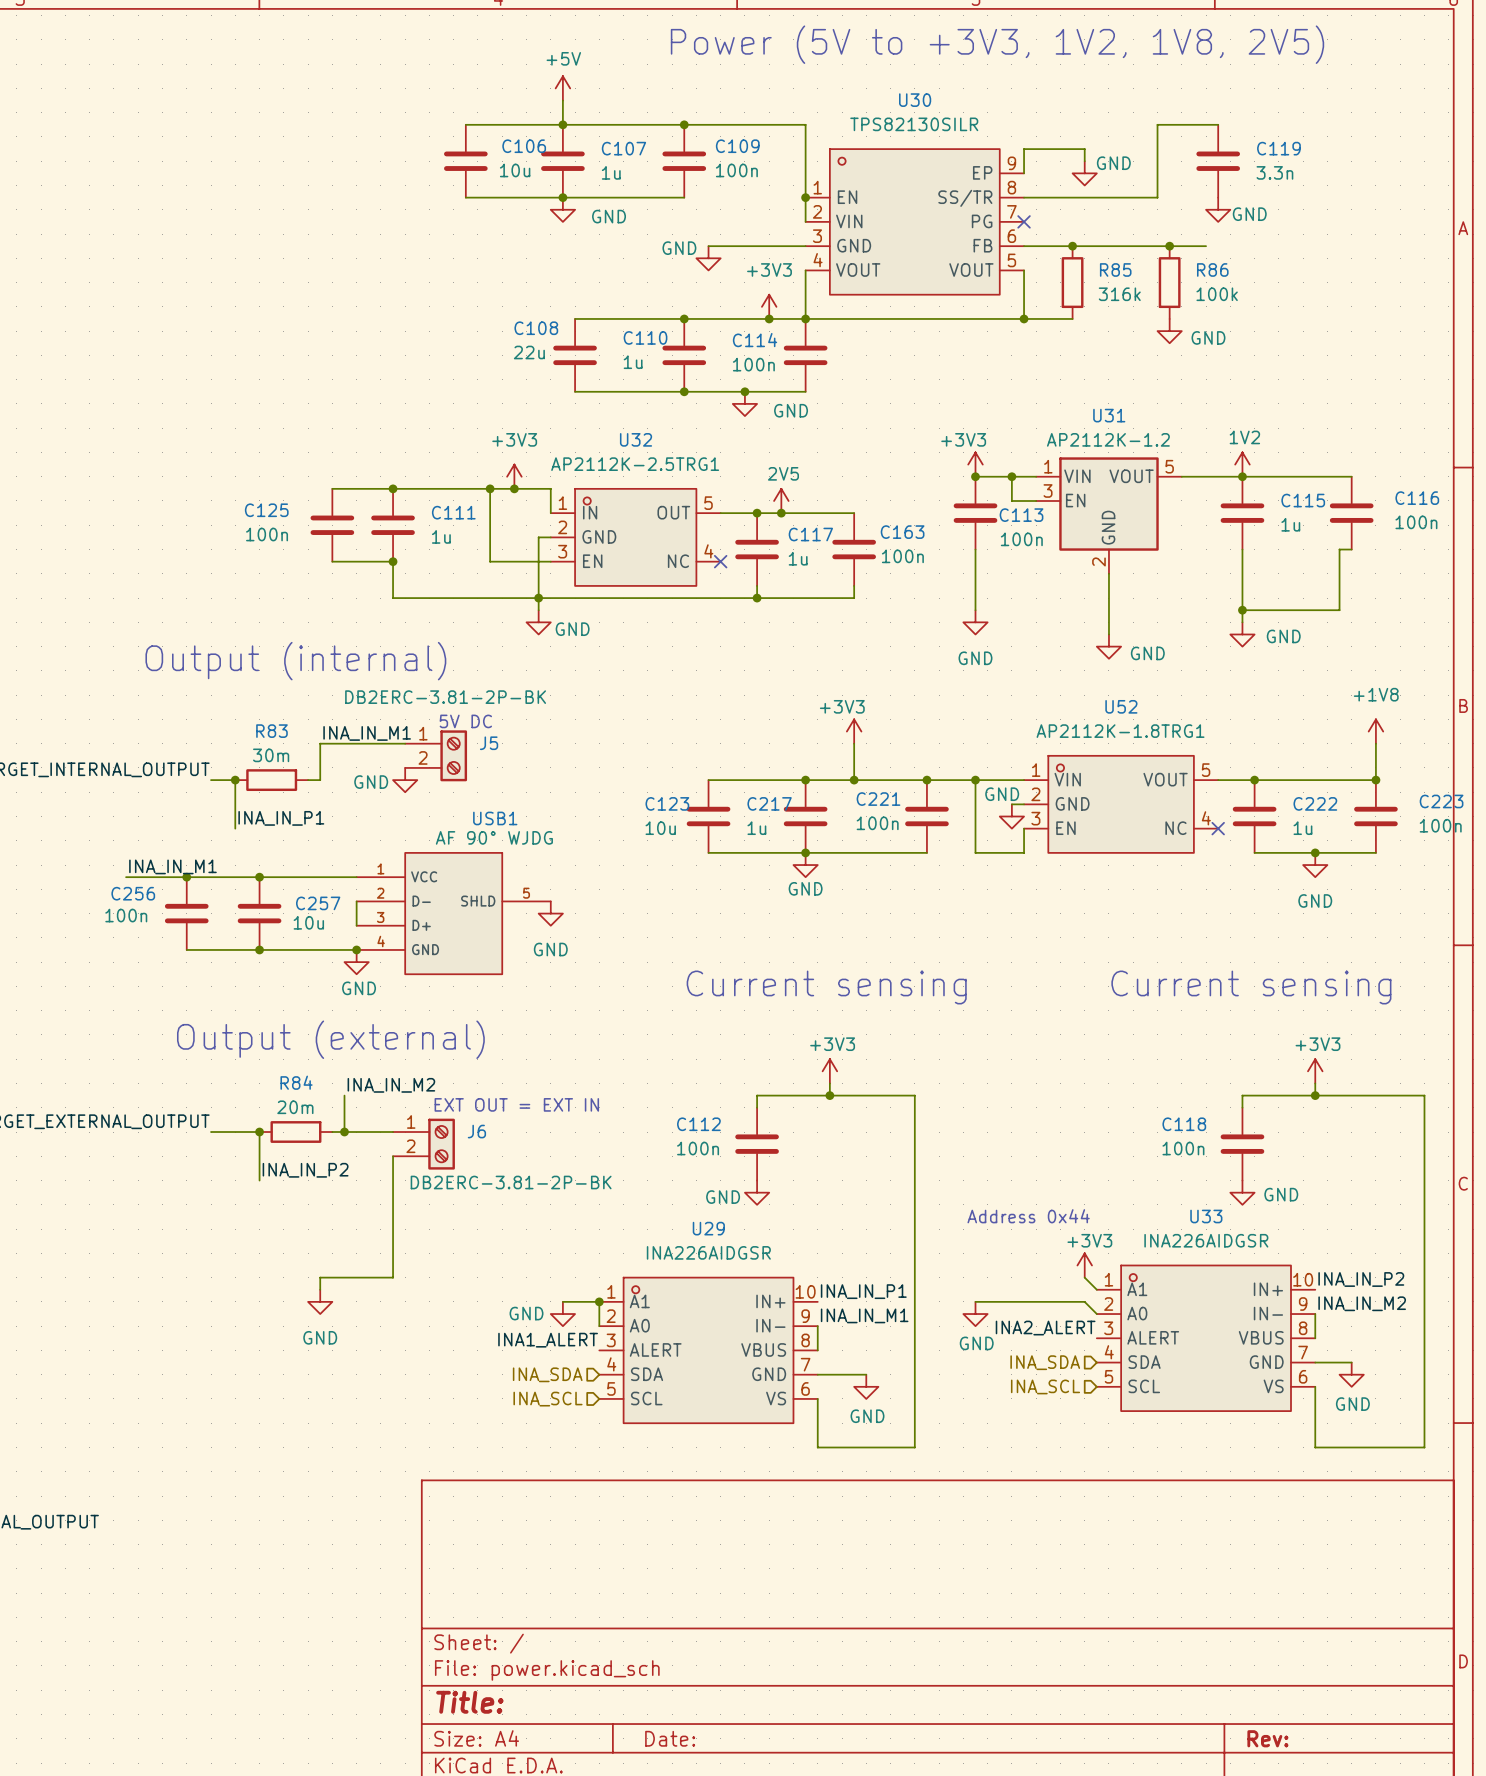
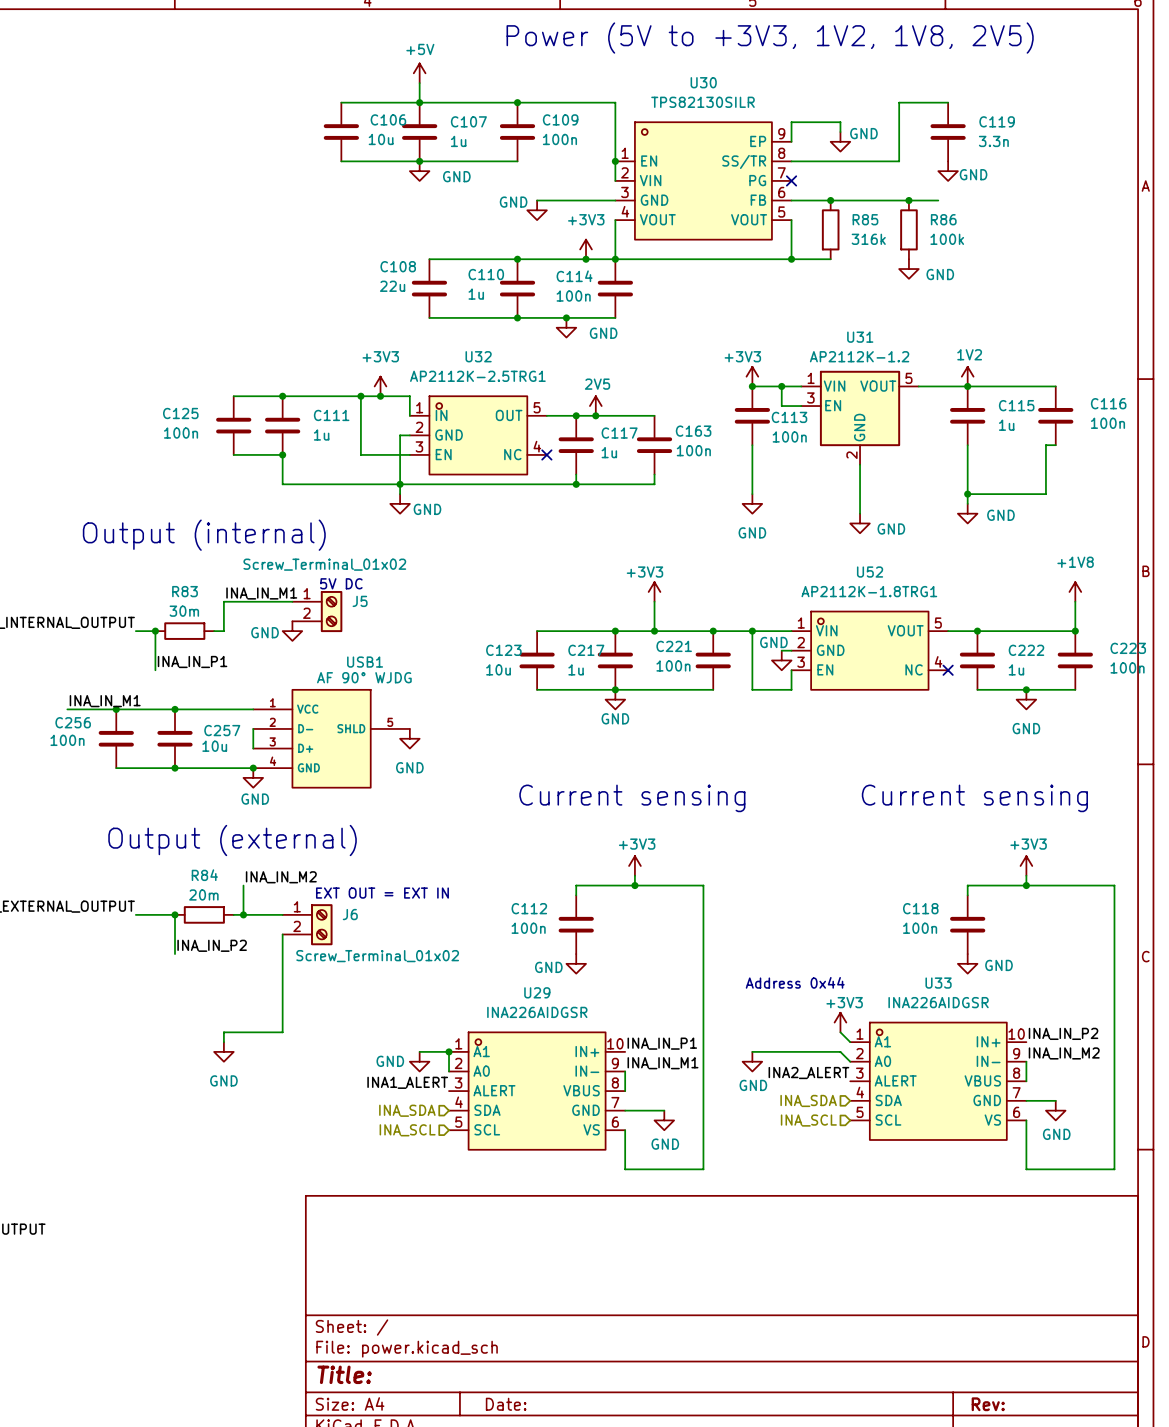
J5 value: DB2ERC-3.81-2P-BK (445, 697) -> Screw_Terminal_01x02 (324, 564)
J6 value: DB2ERC-3.81-2P-BK (511, 1182) -> Screw_Terminal_01x02 (377, 956)

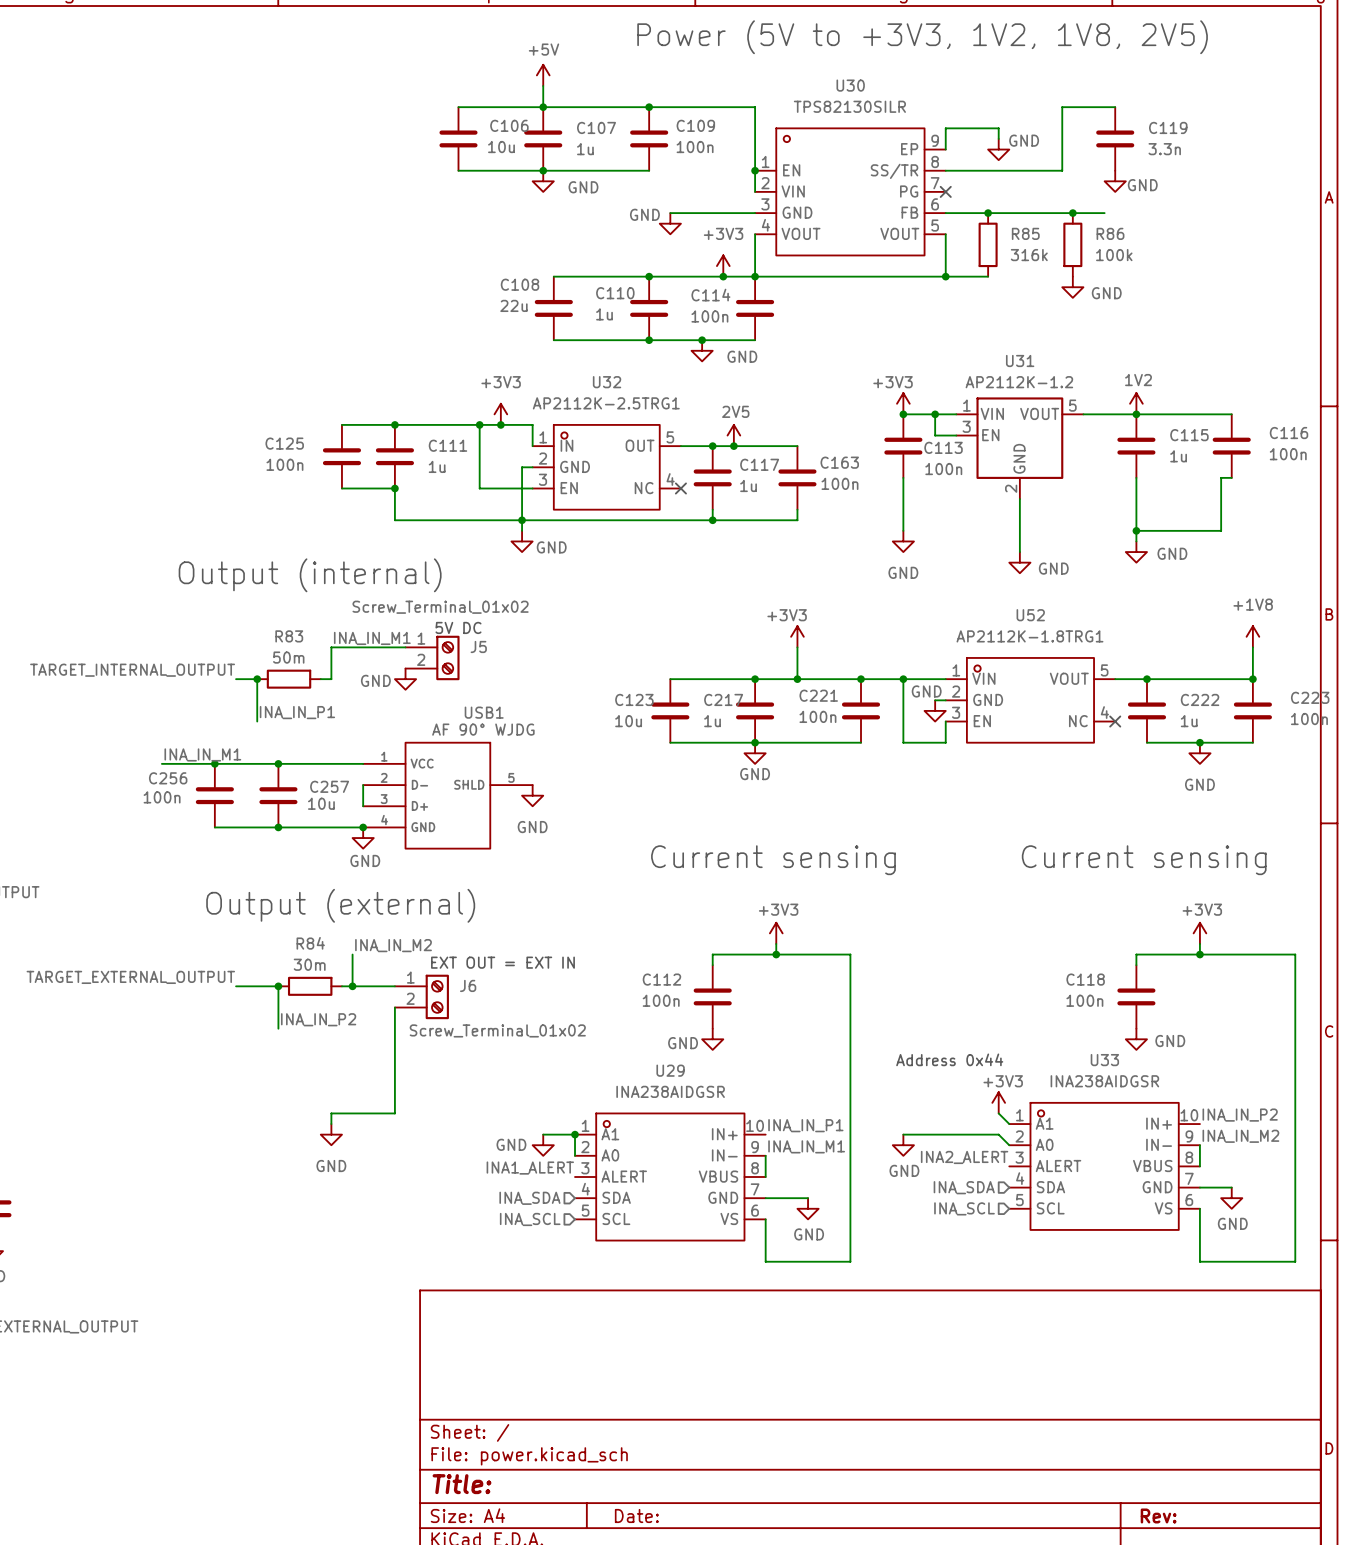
R83 value: 30m (184, 611) -> 50m (288, 657)
R84 value: 20m (203, 894) -> 30m (309, 964)
U33 value: INA226AIDGSR (938, 1002) -> INA238AIDGSR (1104, 1081)
U29 value: INA226AIDGSR (537, 1012) -> INA238AIDGSR (670, 1091)

